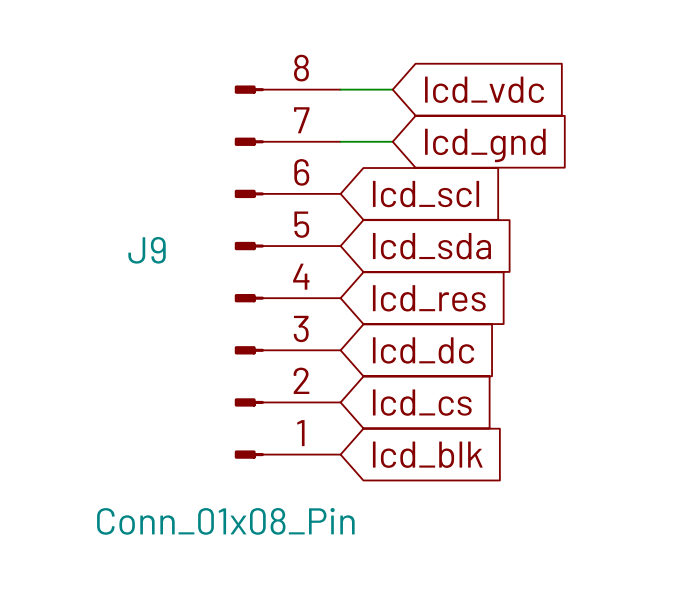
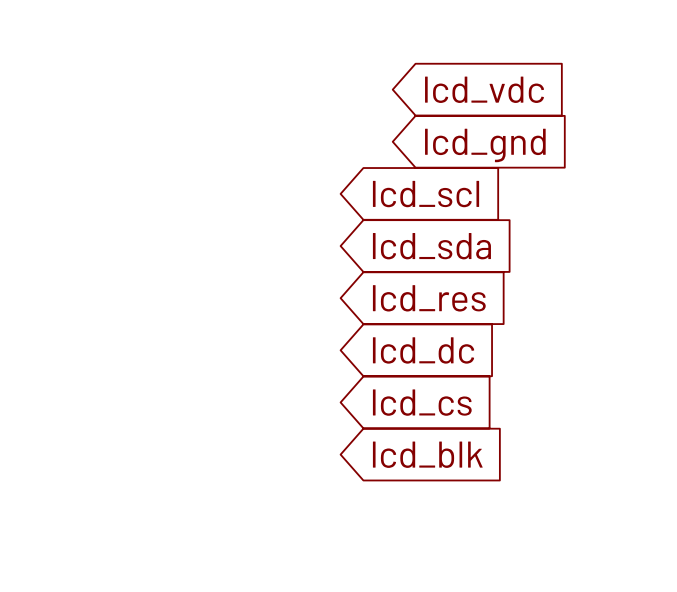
wire: (340, 89) (392, 89) -> none
wire: (340, 141) (392, 141) -> none
J9: Conn_01x08_Pin (287, 272) -> none

